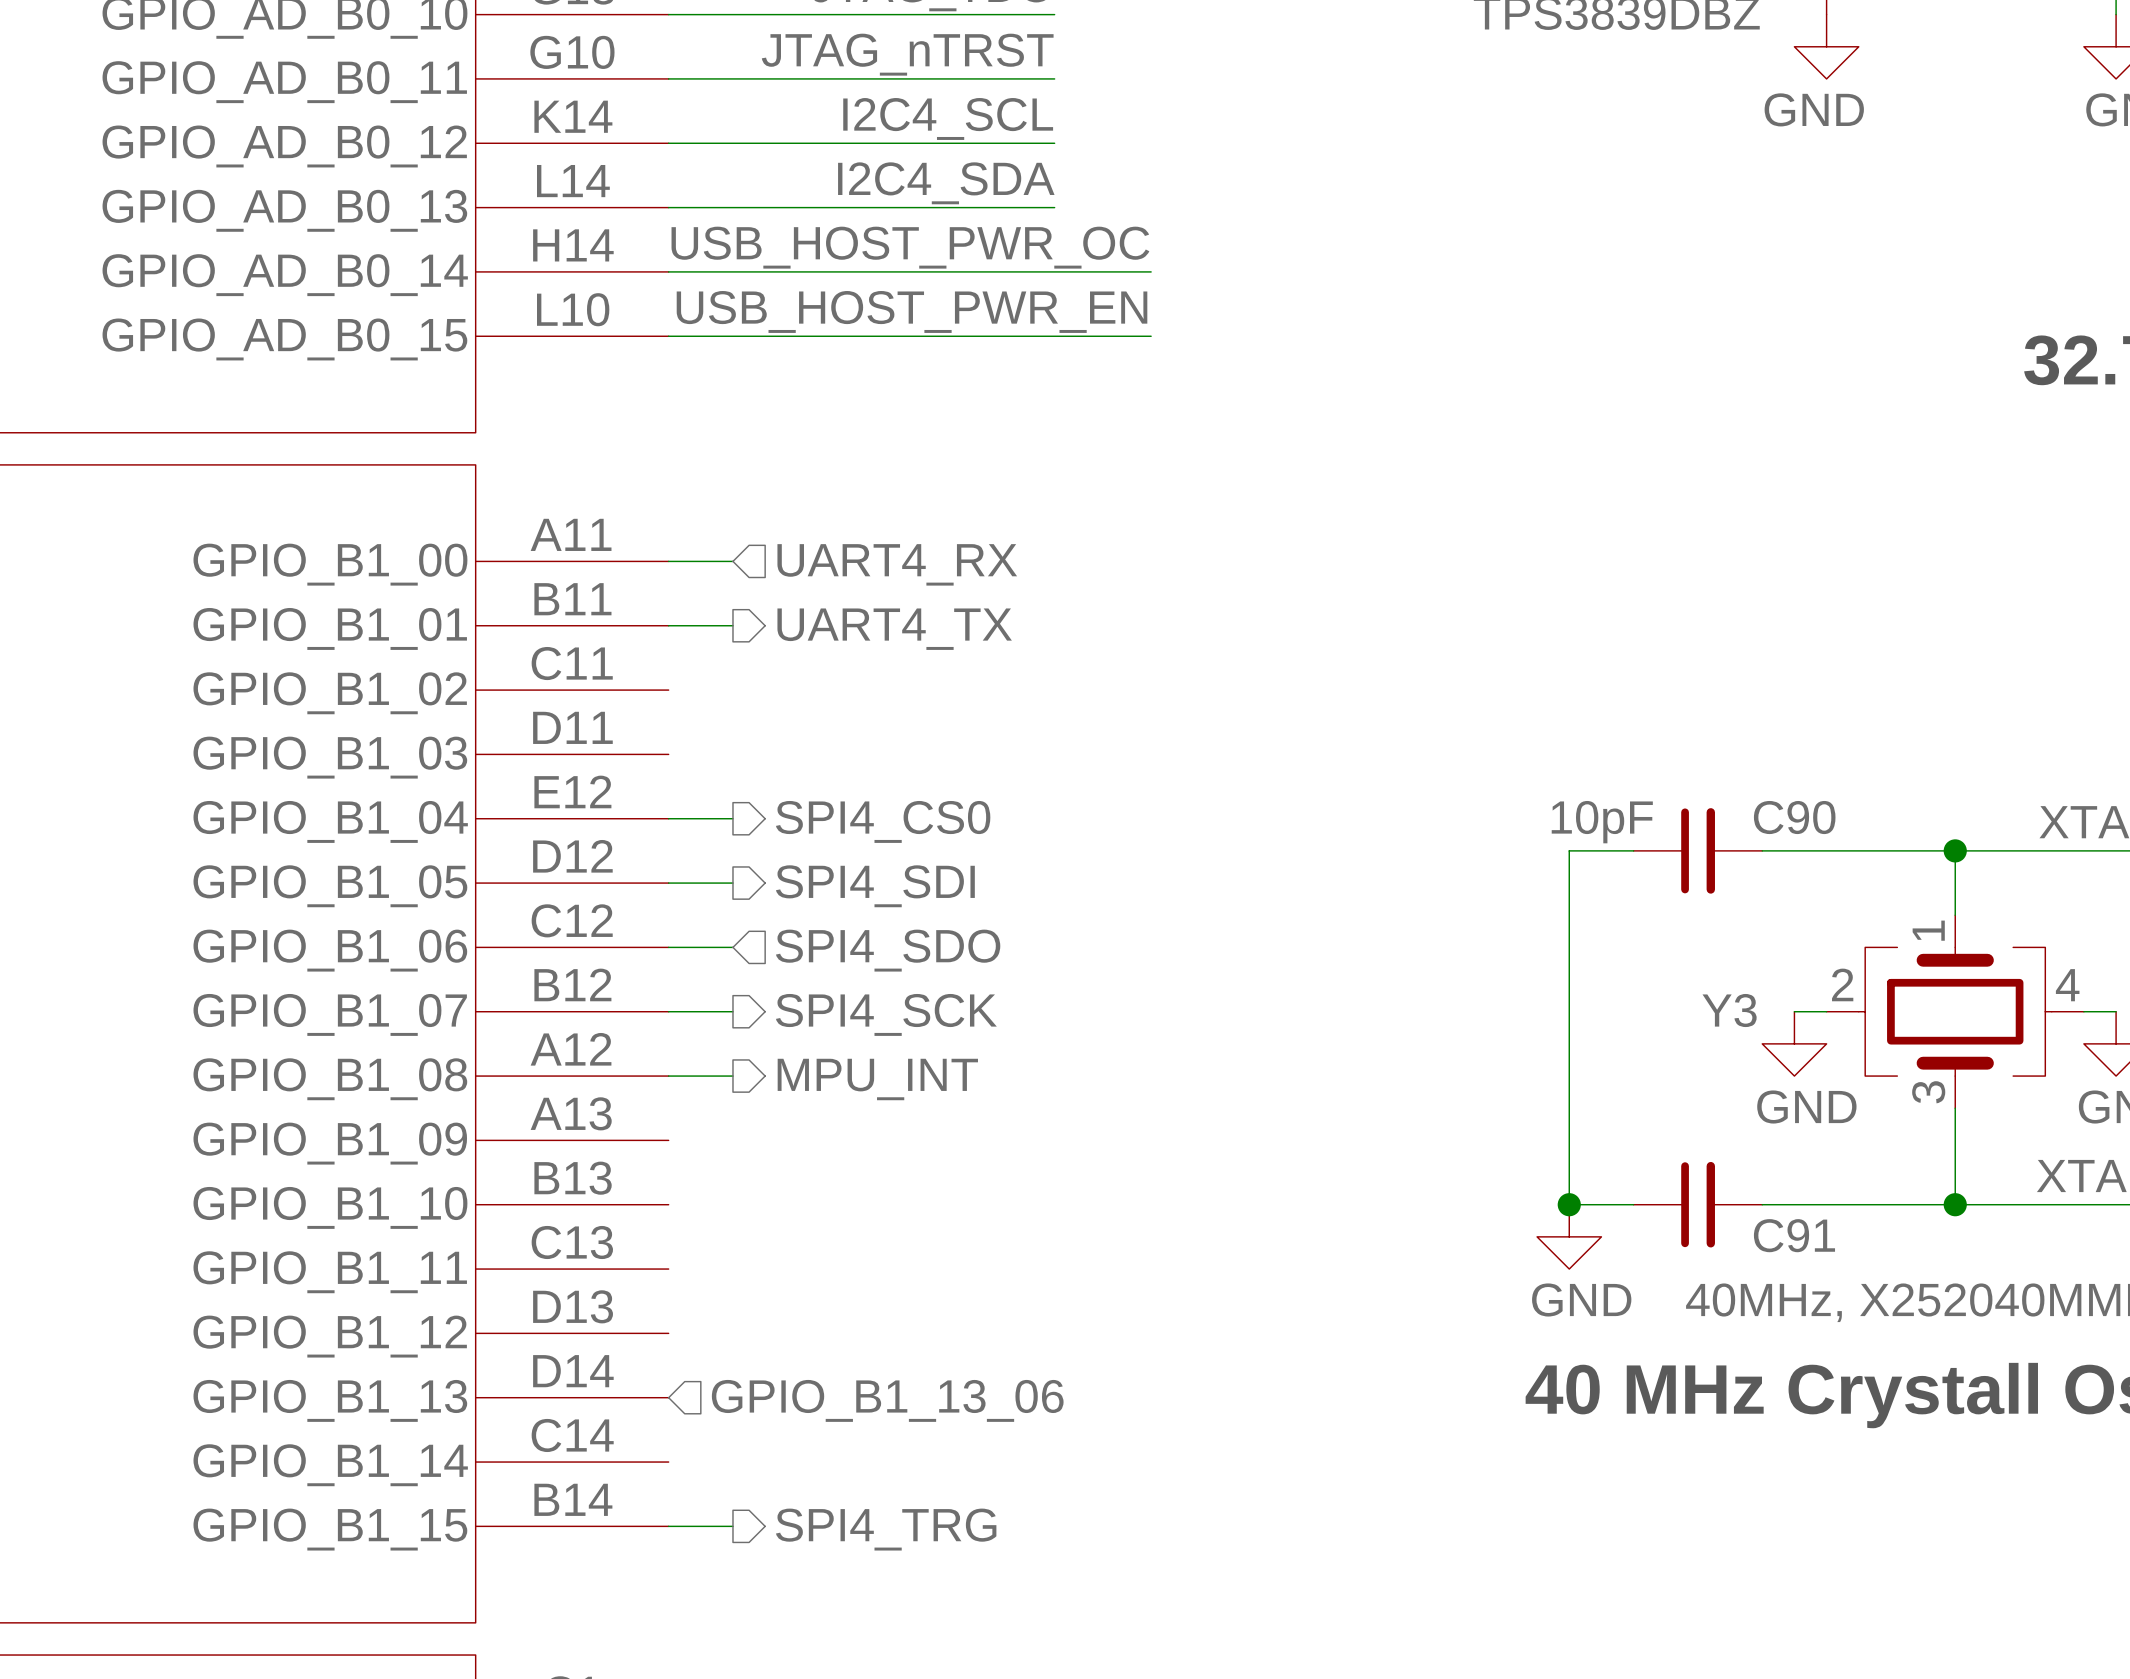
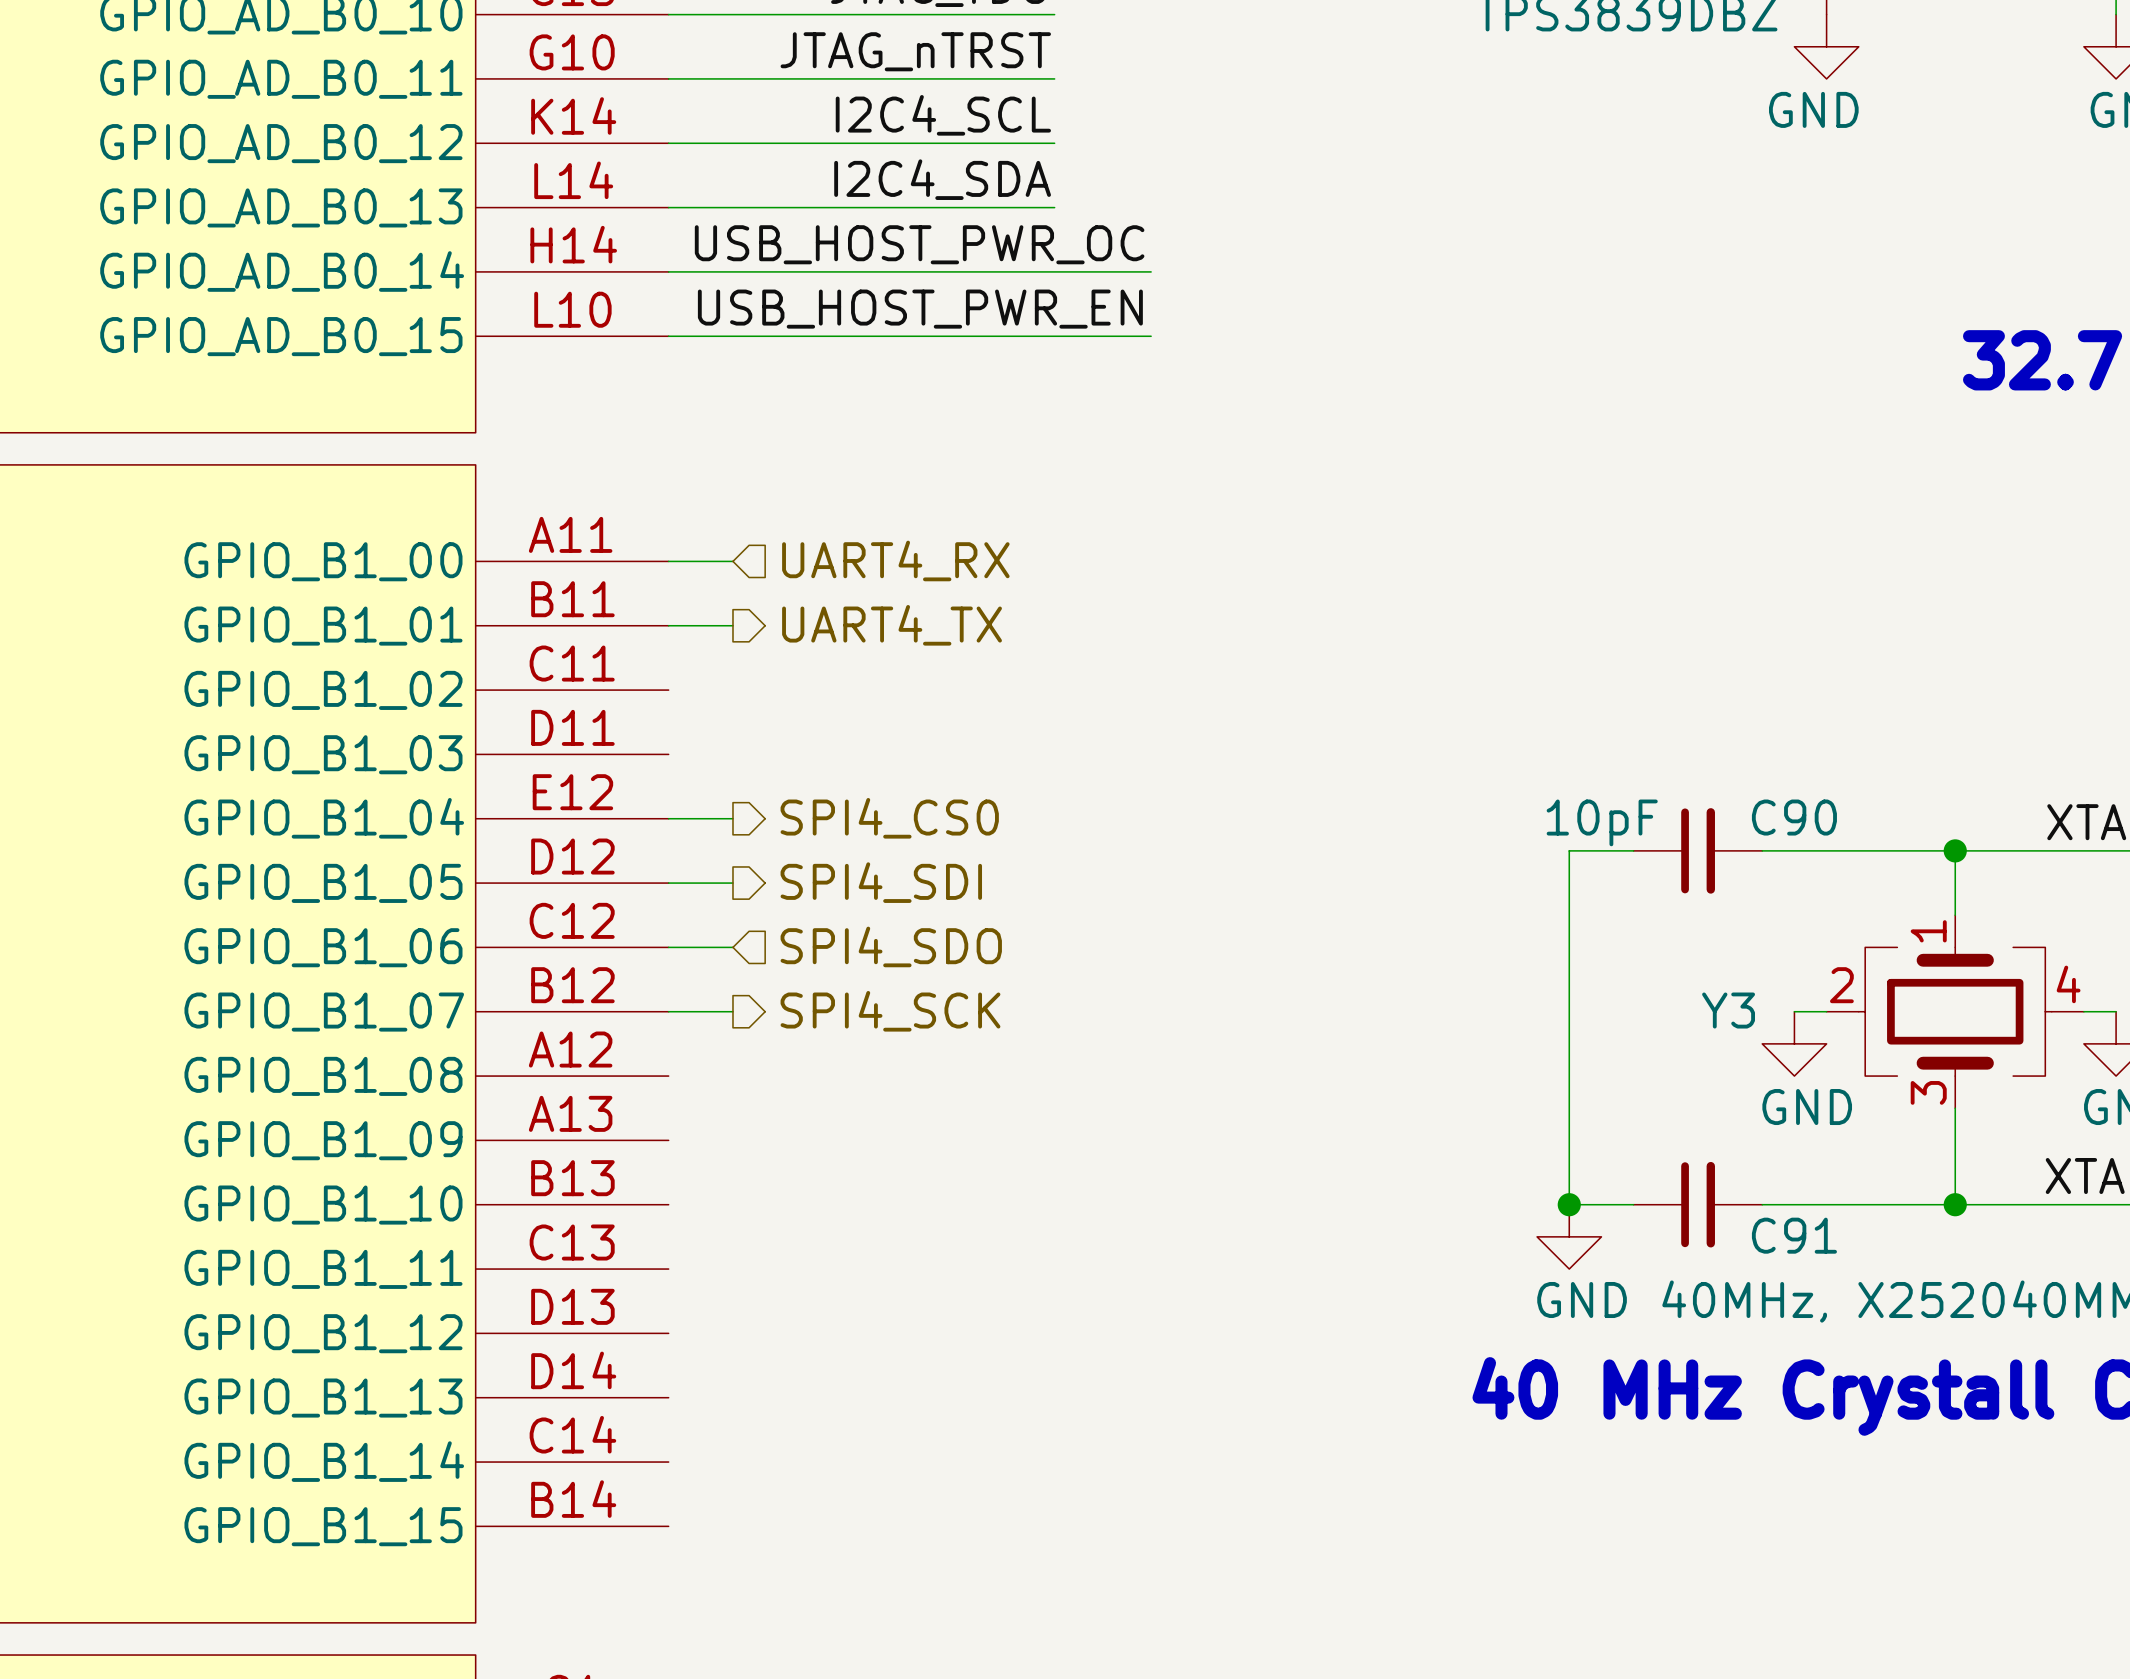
wire: (668, 1076) (732, 1076) -> none
hierarchical label: MPU_INT (877, 1079) -> none
hierarchical label: GPIO_B1_13_06 (887, 1400) -> none
wire: (668, 1526) (732, 1526) -> none
hierarchical label: SPI4_TRG (886, 1529) -> none

